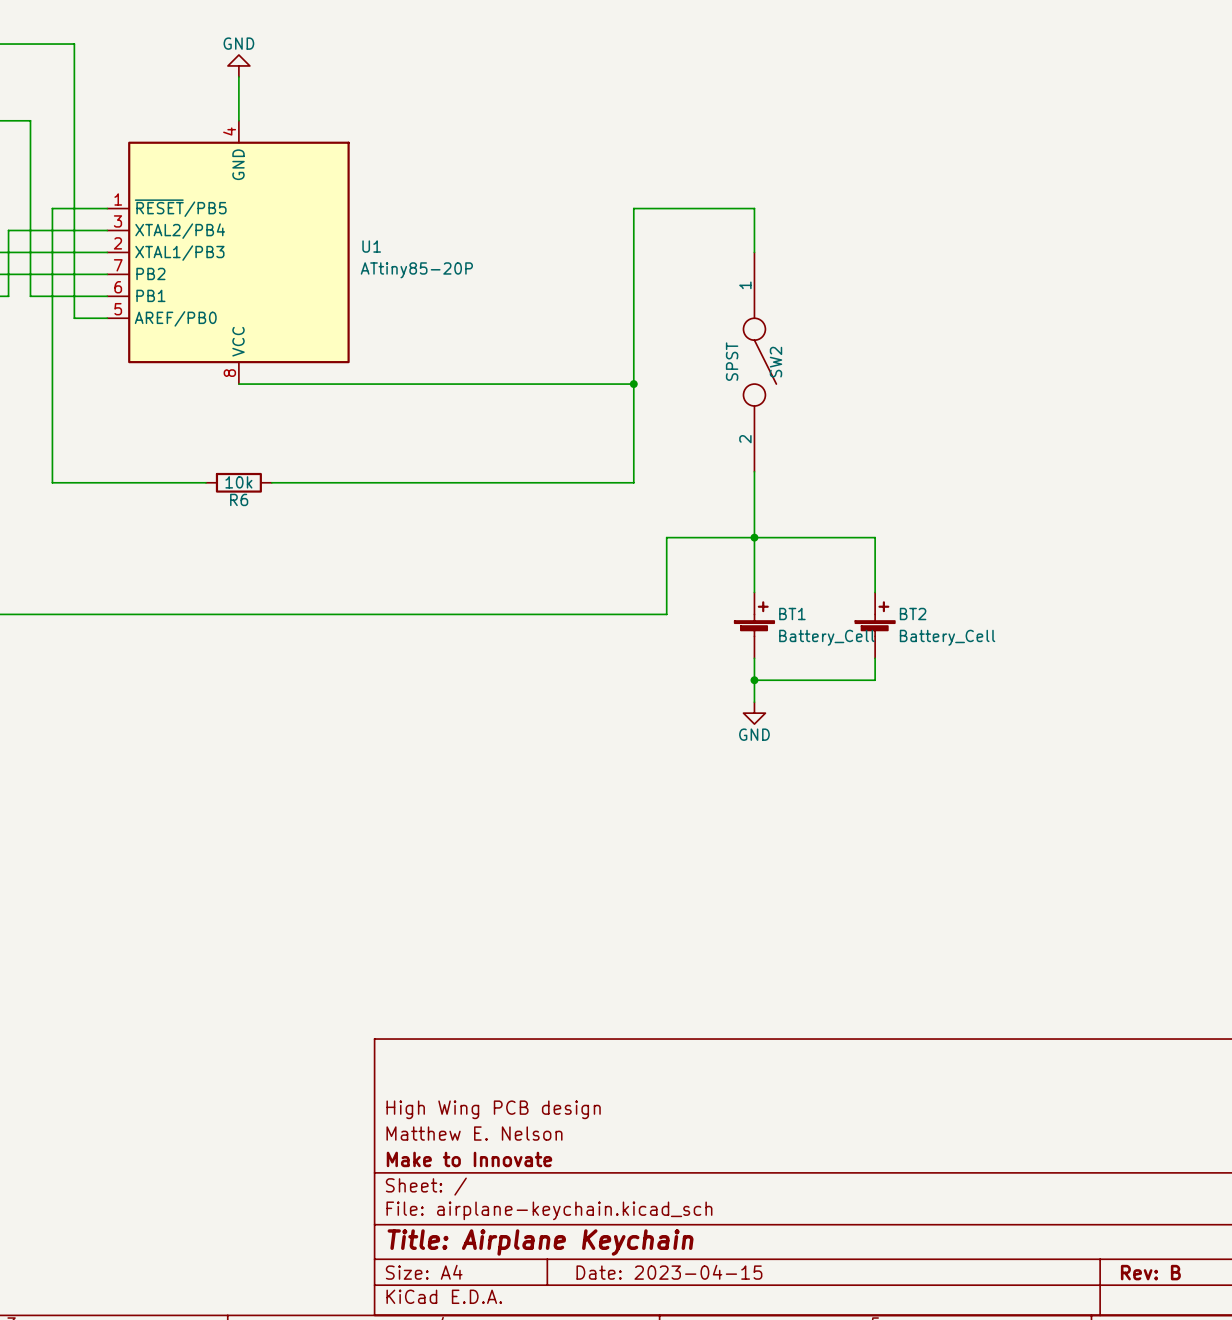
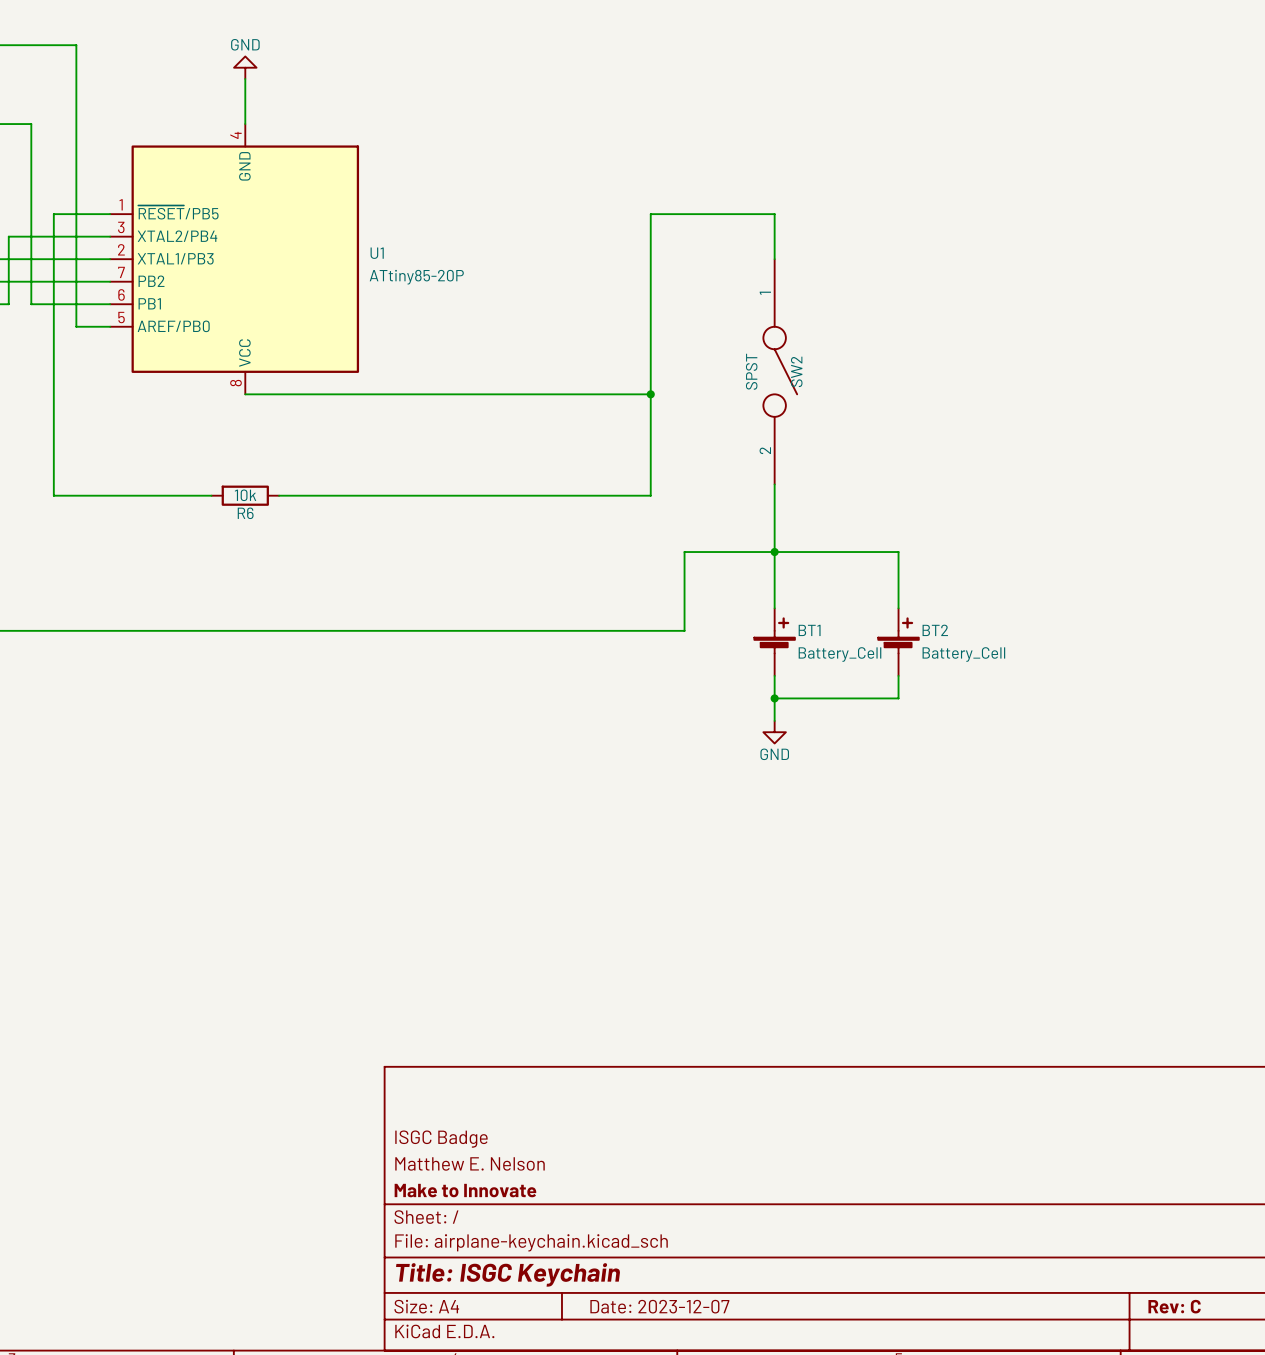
title block: High Wing PCB design (493, 1109) -> ISGC Badge (441, 1139)
title block: Title: Airplane Keychain (540, 1242) -> Title: ISGC Keychain (508, 1274)
title block: Date: 2023-04-15 (669, 1272) -> Date: 2023-12-07 (659, 1306)
title block: Rev: B (1150, 1272) -> Rev: C (1174, 1306)

